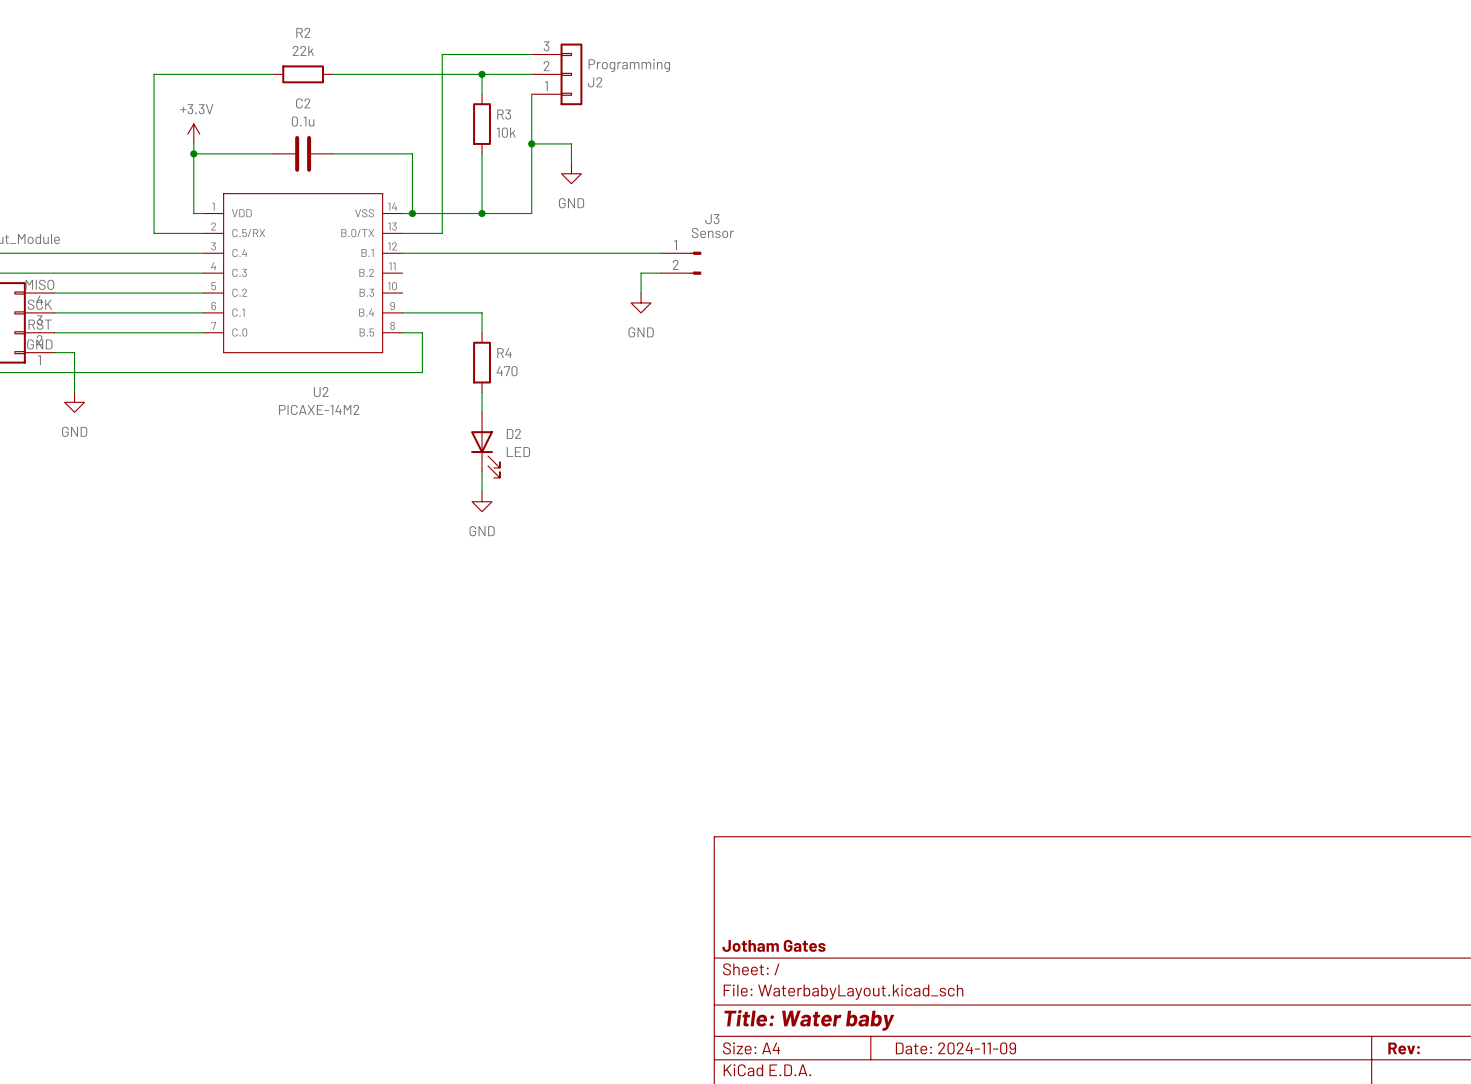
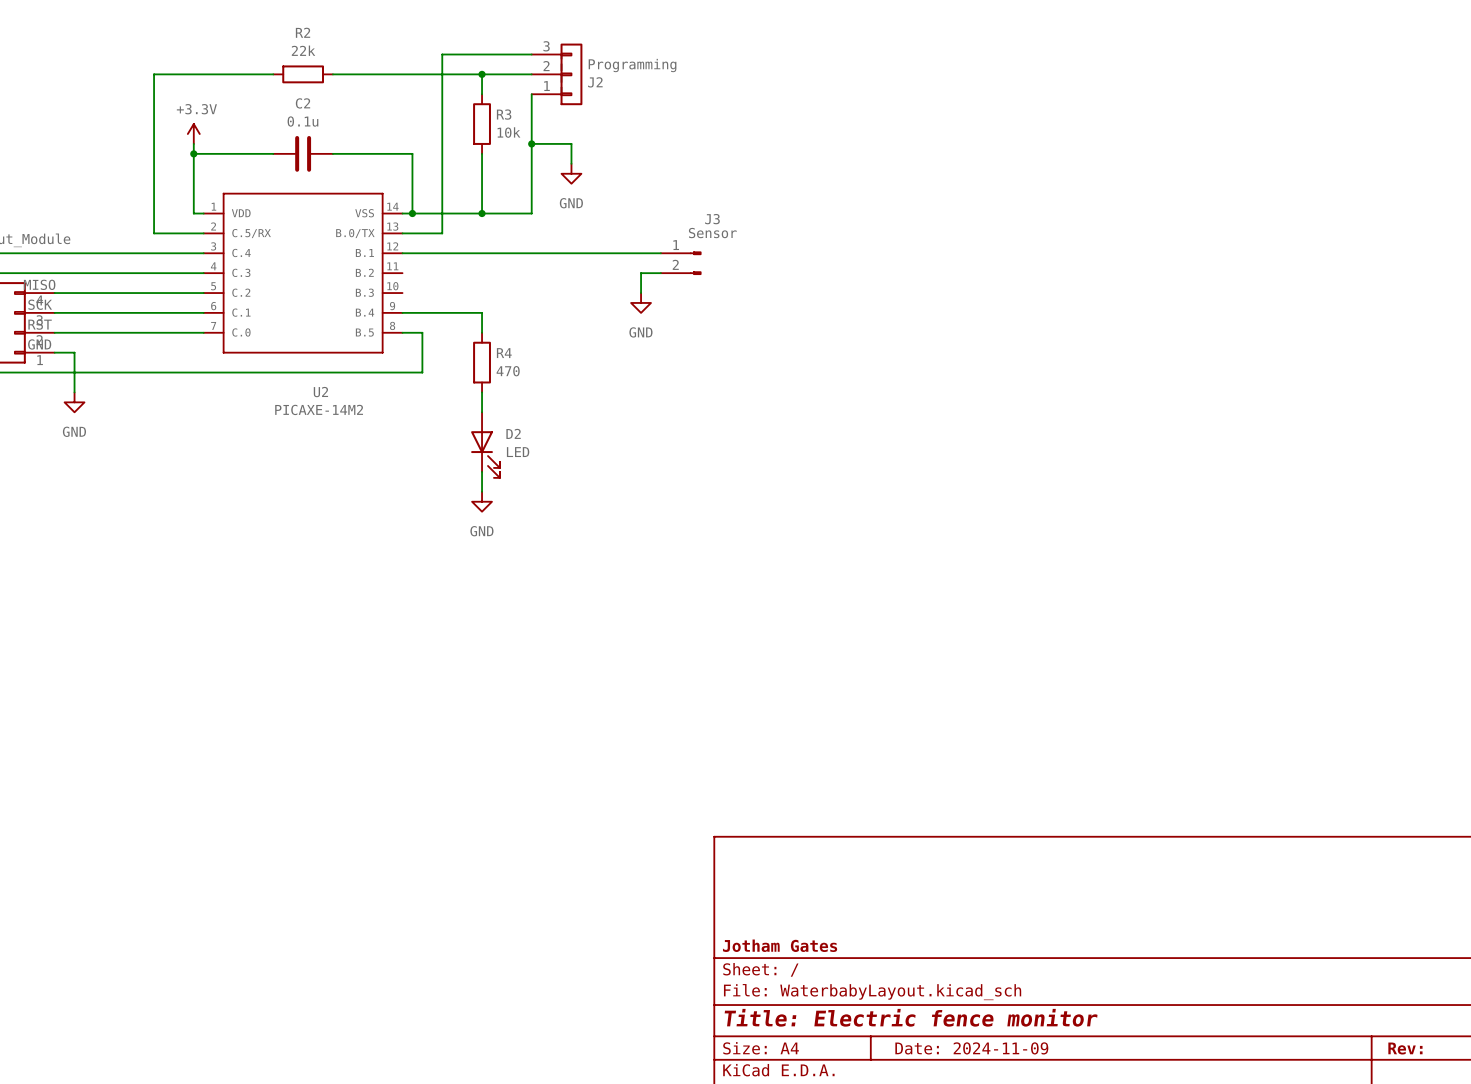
title block: Title: Water baby (809, 1020) -> Title: Electric fence monitor (911, 1017)

